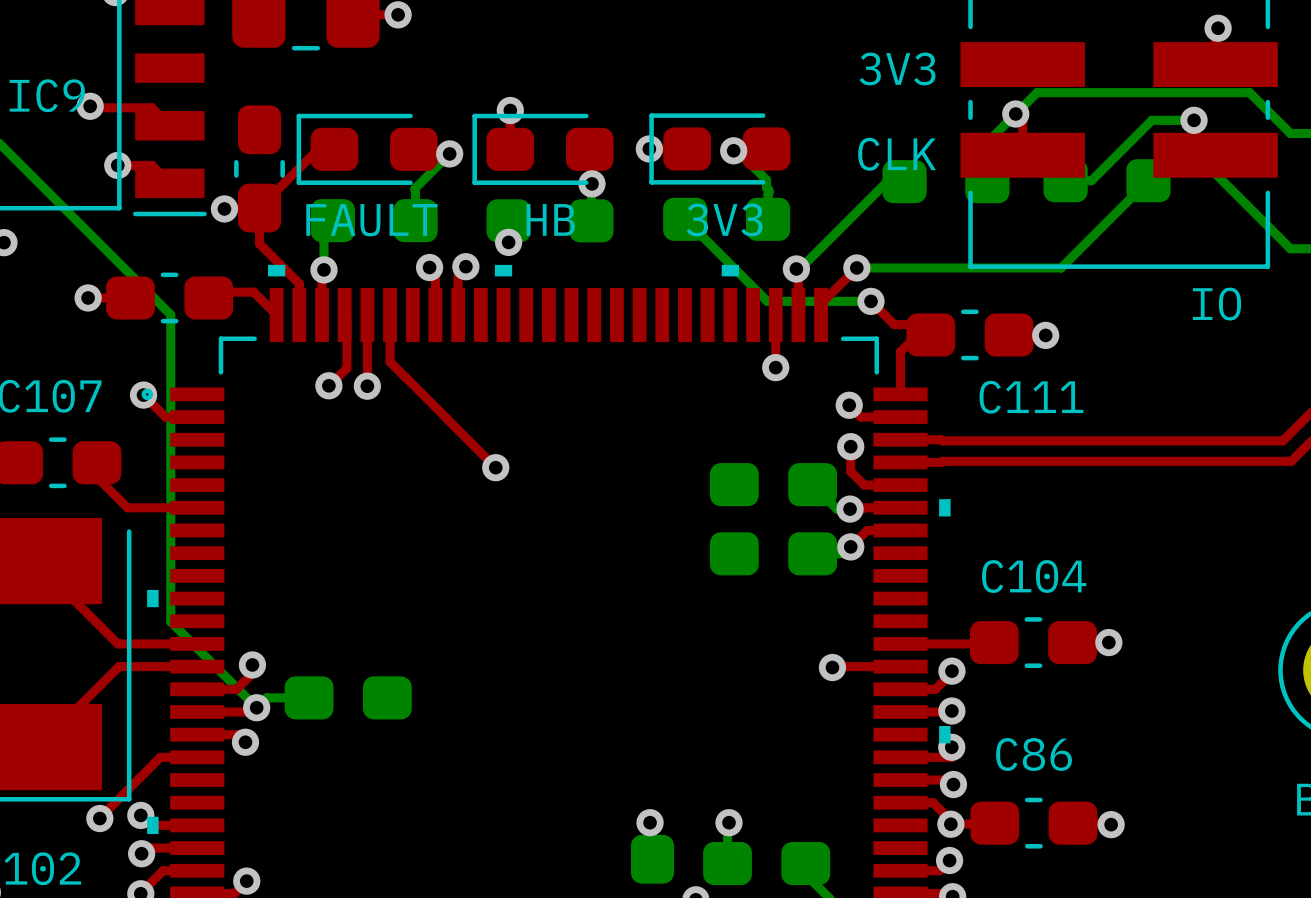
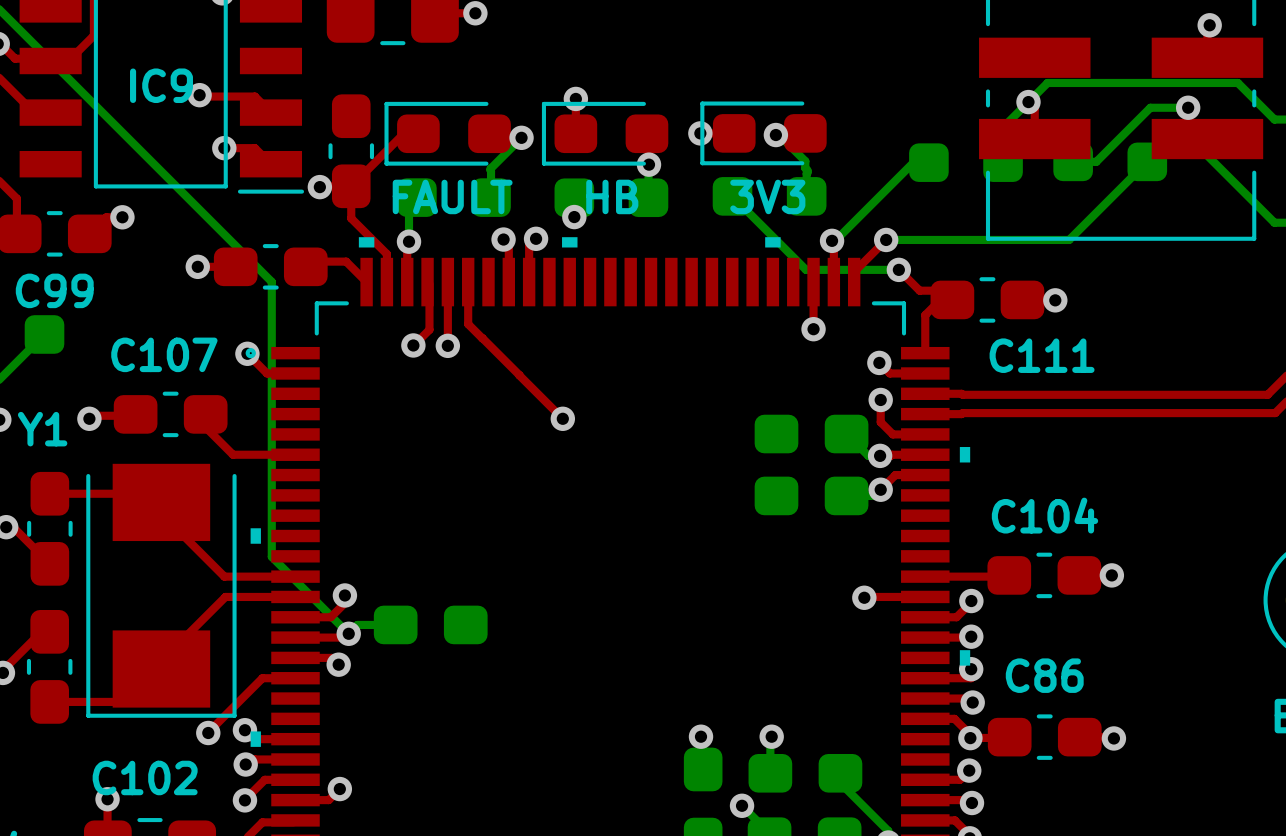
text: 3V3 (897, 68) -> none
text: CLK (897, 154) -> none
text: IO (1216, 304) -> none

